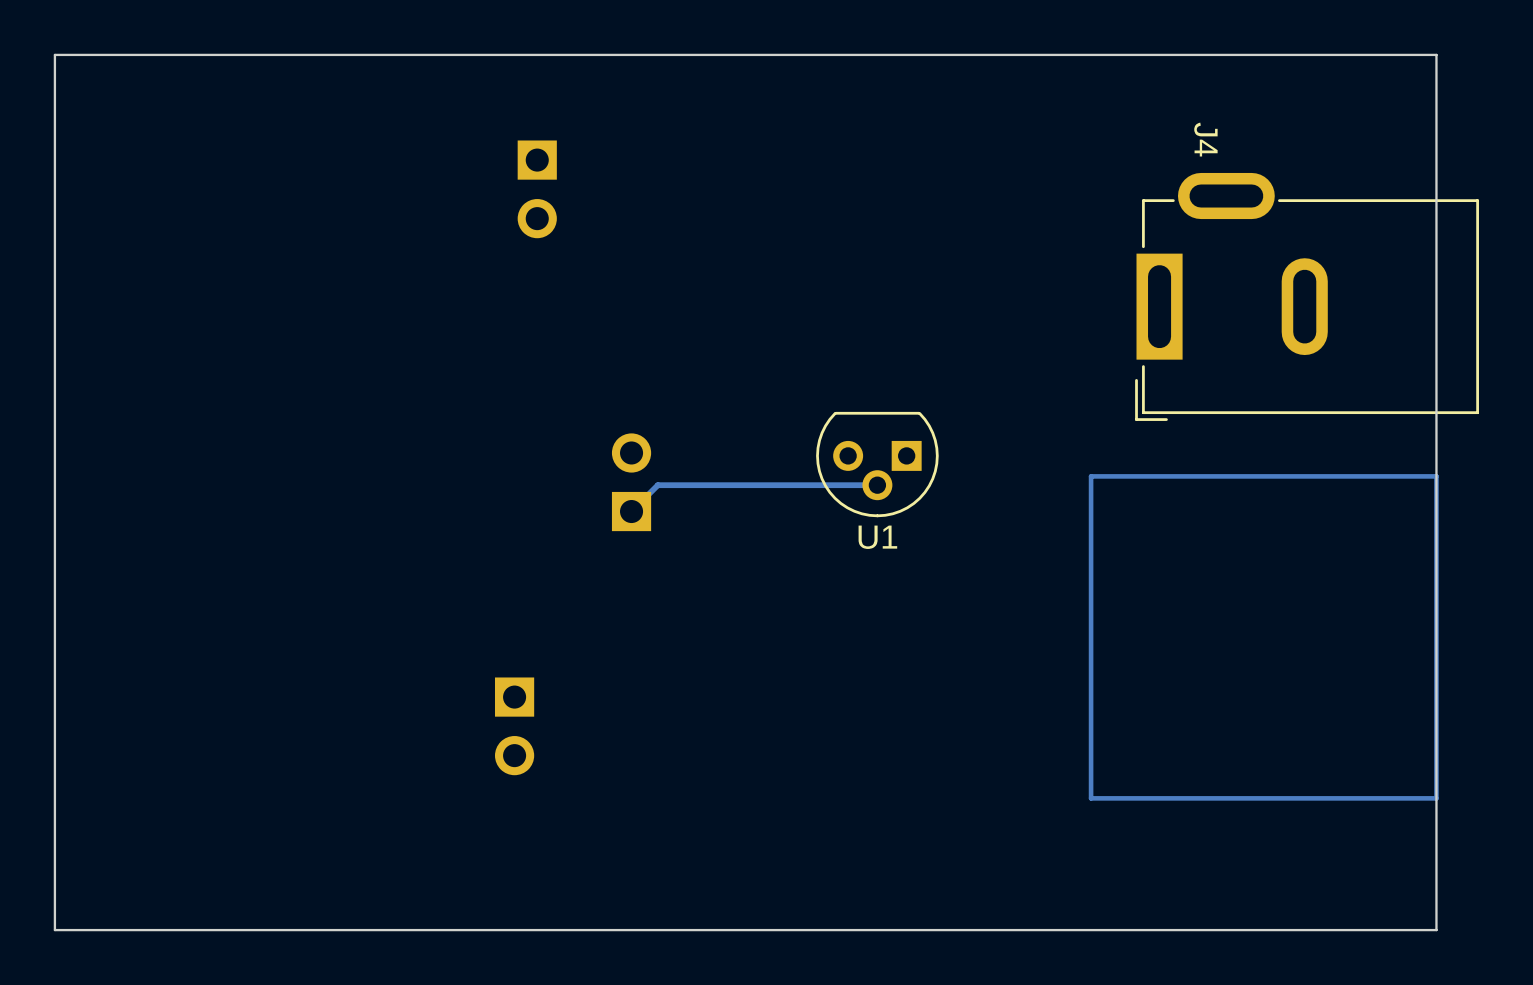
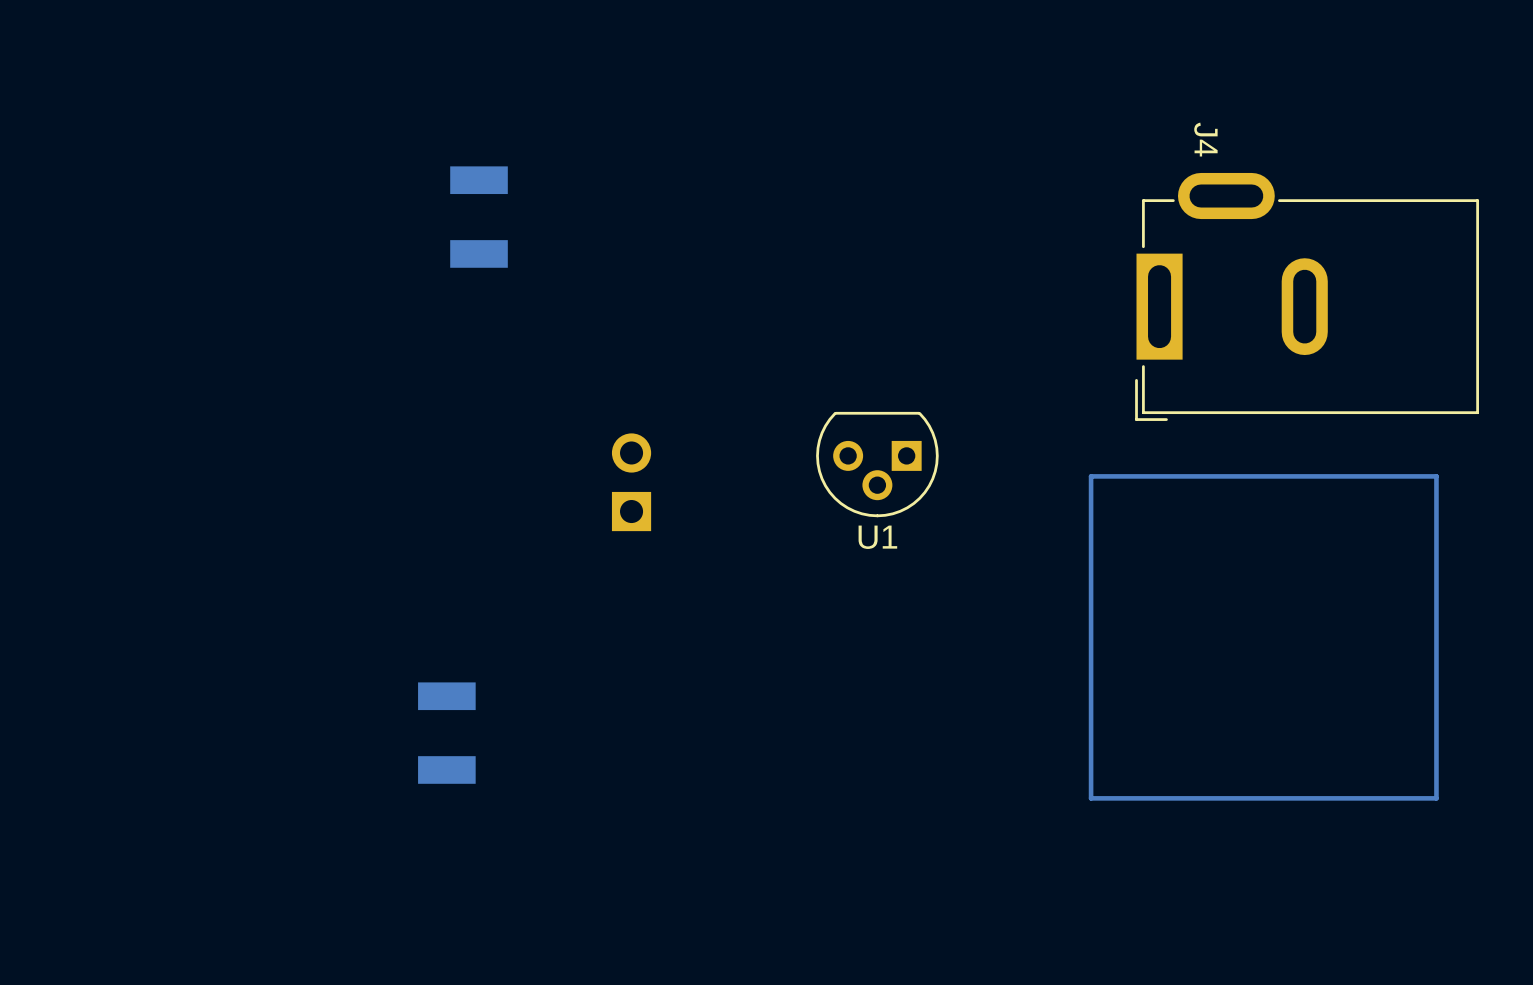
board edge: (1436, 54) (54, 54) (54, 930) (1436, 930) (1436, 54) -> none
part: (537, 189) -> none
part: none -> (479, 217)
track: (877, 485) (657, 485) (631, 511) -> none
part: (514, 726) -> none
part: none -> (446, 733)

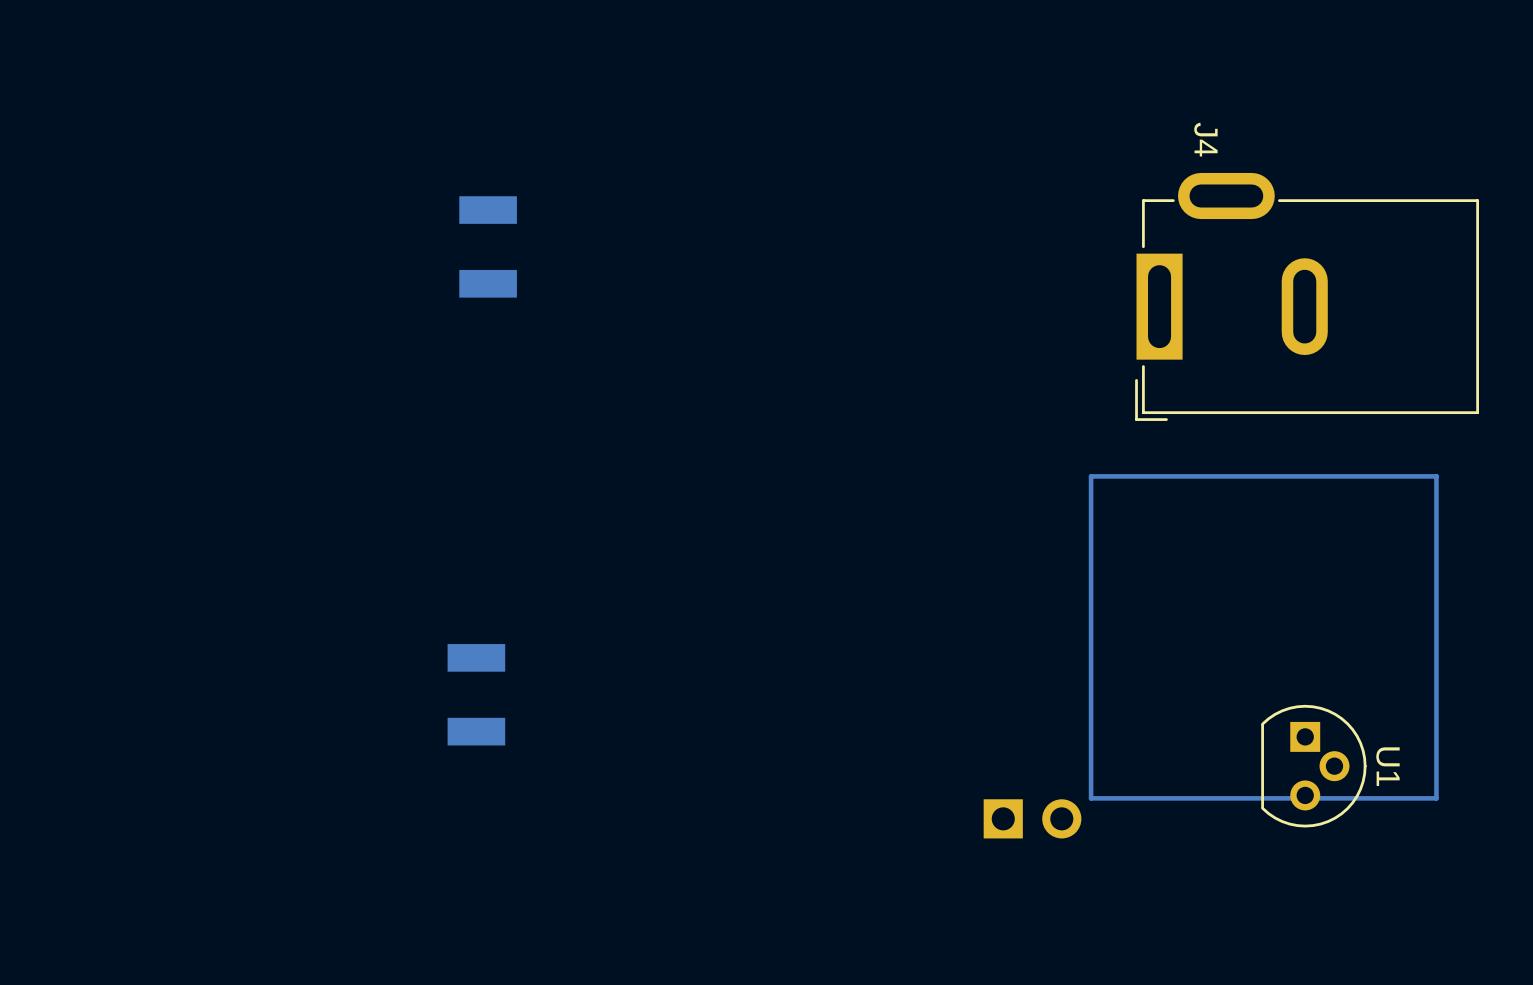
part position: (479, 217) -> (488, 246)
U1 rotation: 0° (877, 464) -> 90° counterclockwise (1313, 766)
U1 position: (877, 464) -> (1313, 766)
part rotation: 0° (631, 482) -> 90° clockwise (1032, 818)
part position: (631, 482) -> (1032, 818)
part position: (446, 733) -> (476, 694)

